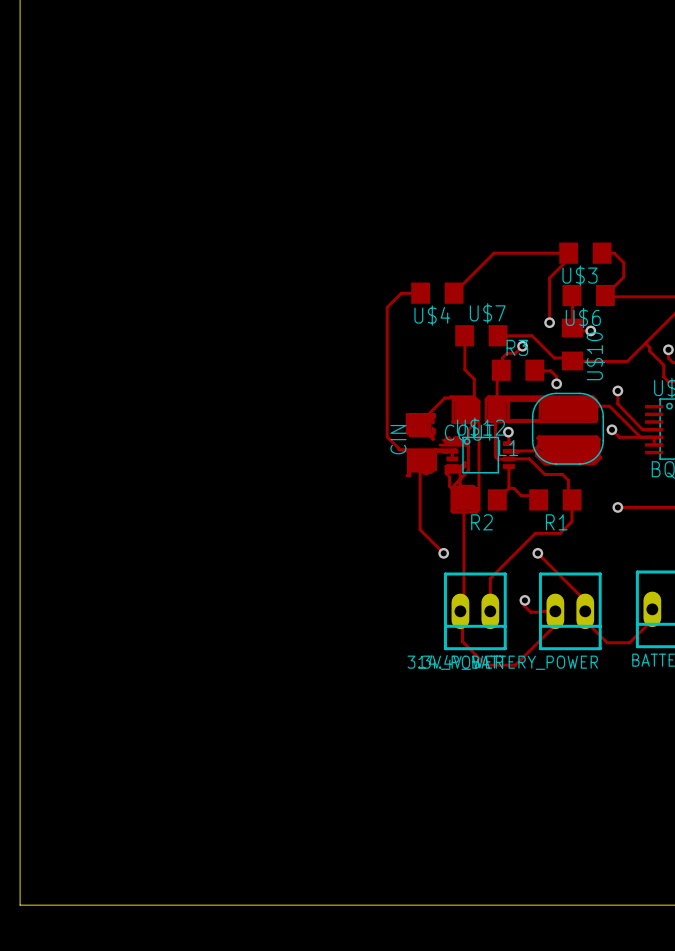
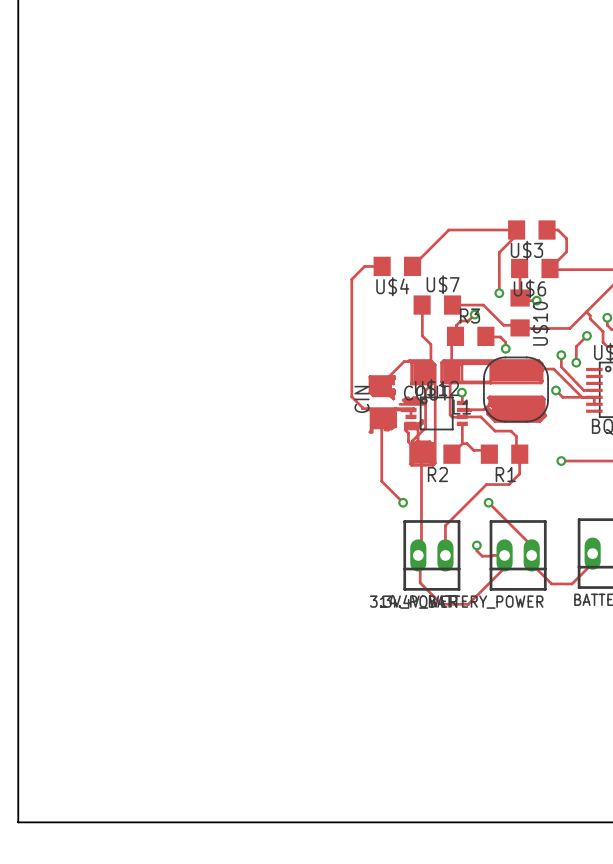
track: none -> (587, 335) (576, 346) (576, 362)
via: none -> (587, 335)
via: none -> (576, 362)

